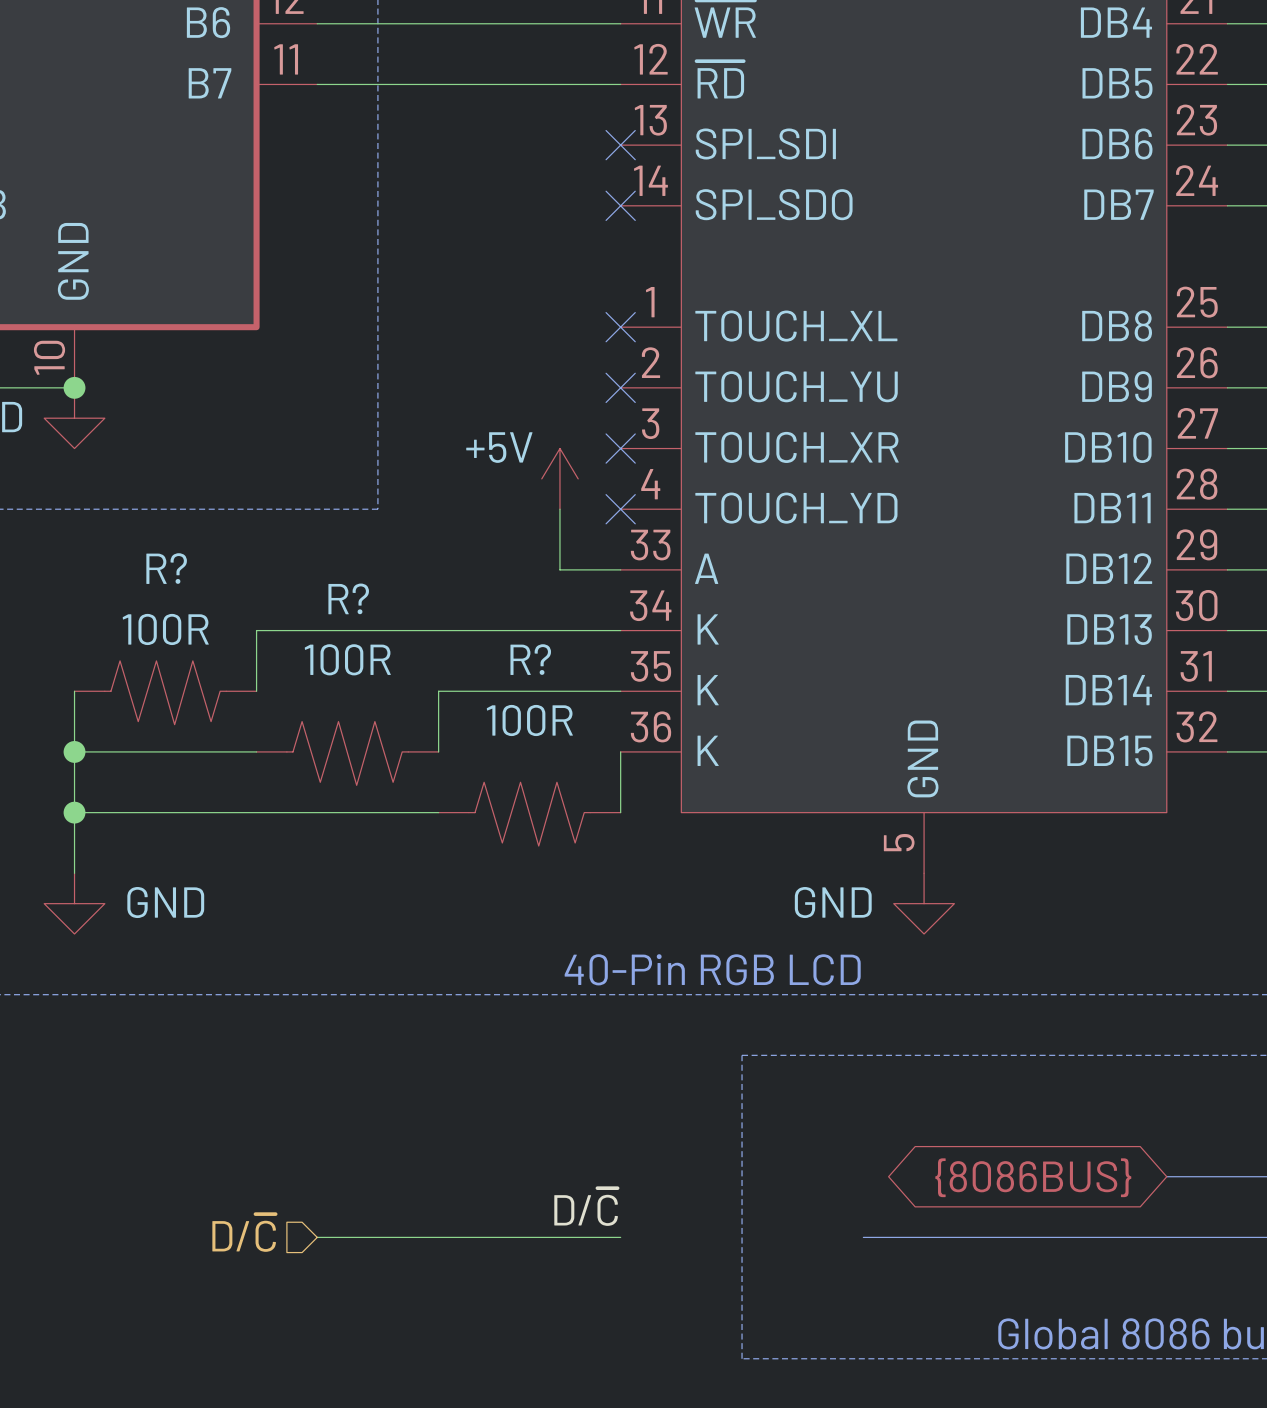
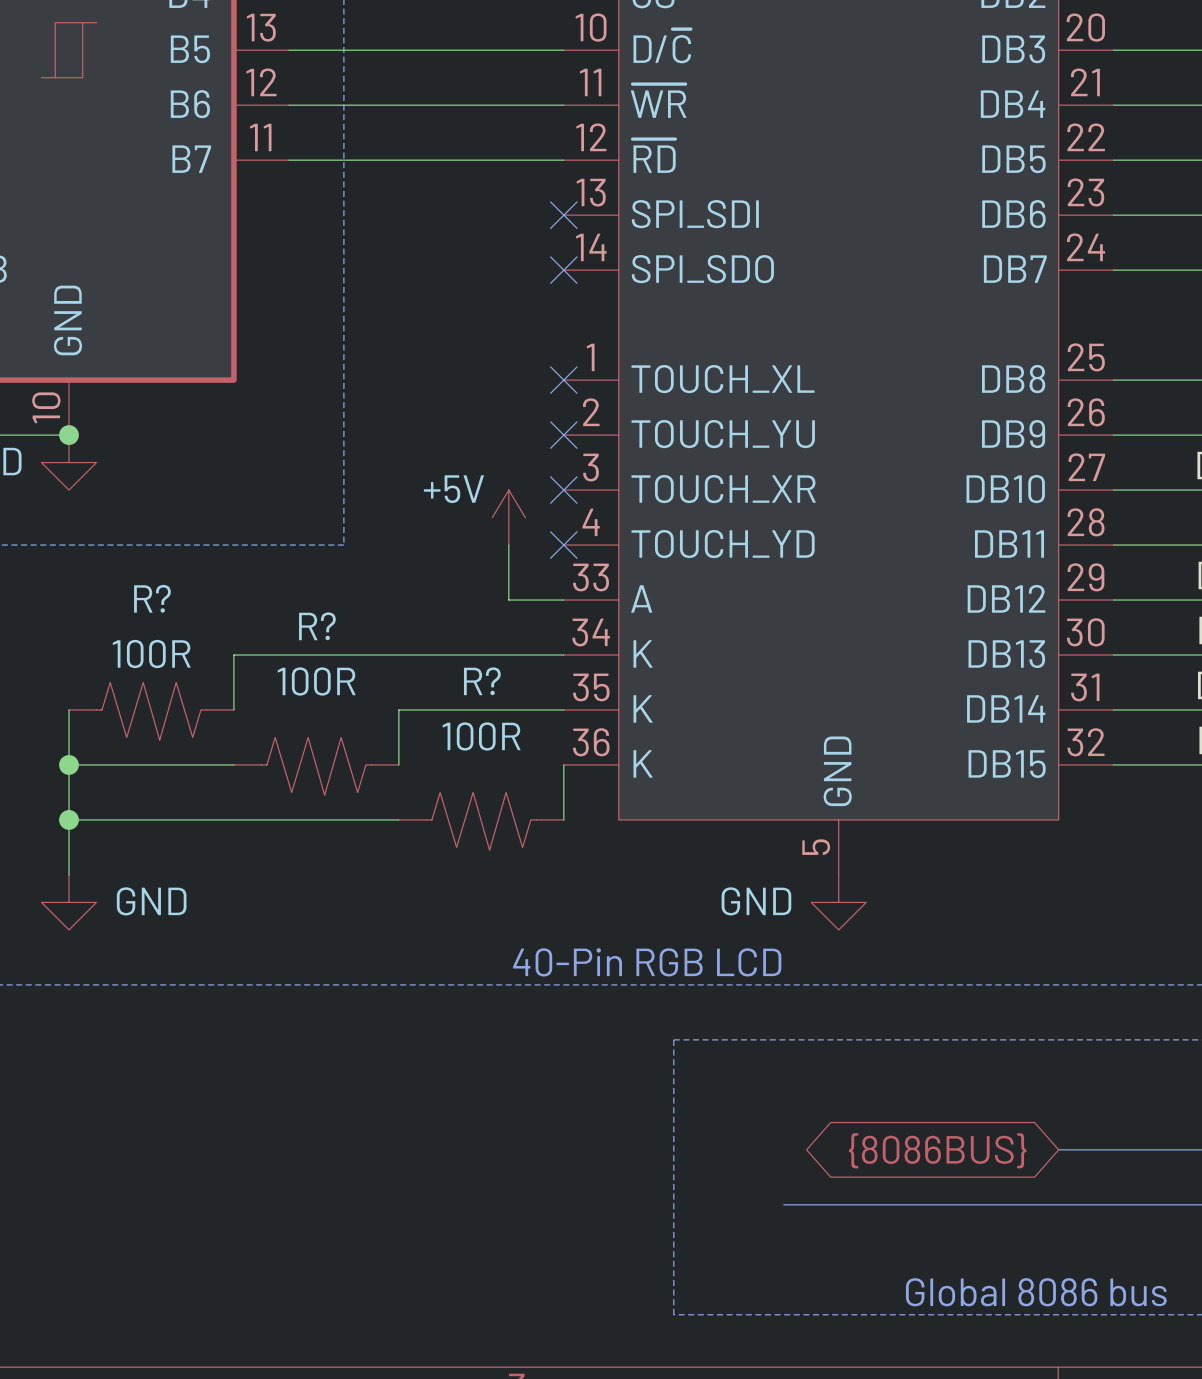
label: D/~{C} (586, 1207) -> none
hierarchical label: D/~{C} (244, 1232) -> none
wire: (317, 1237) (620, 1237) -> none

